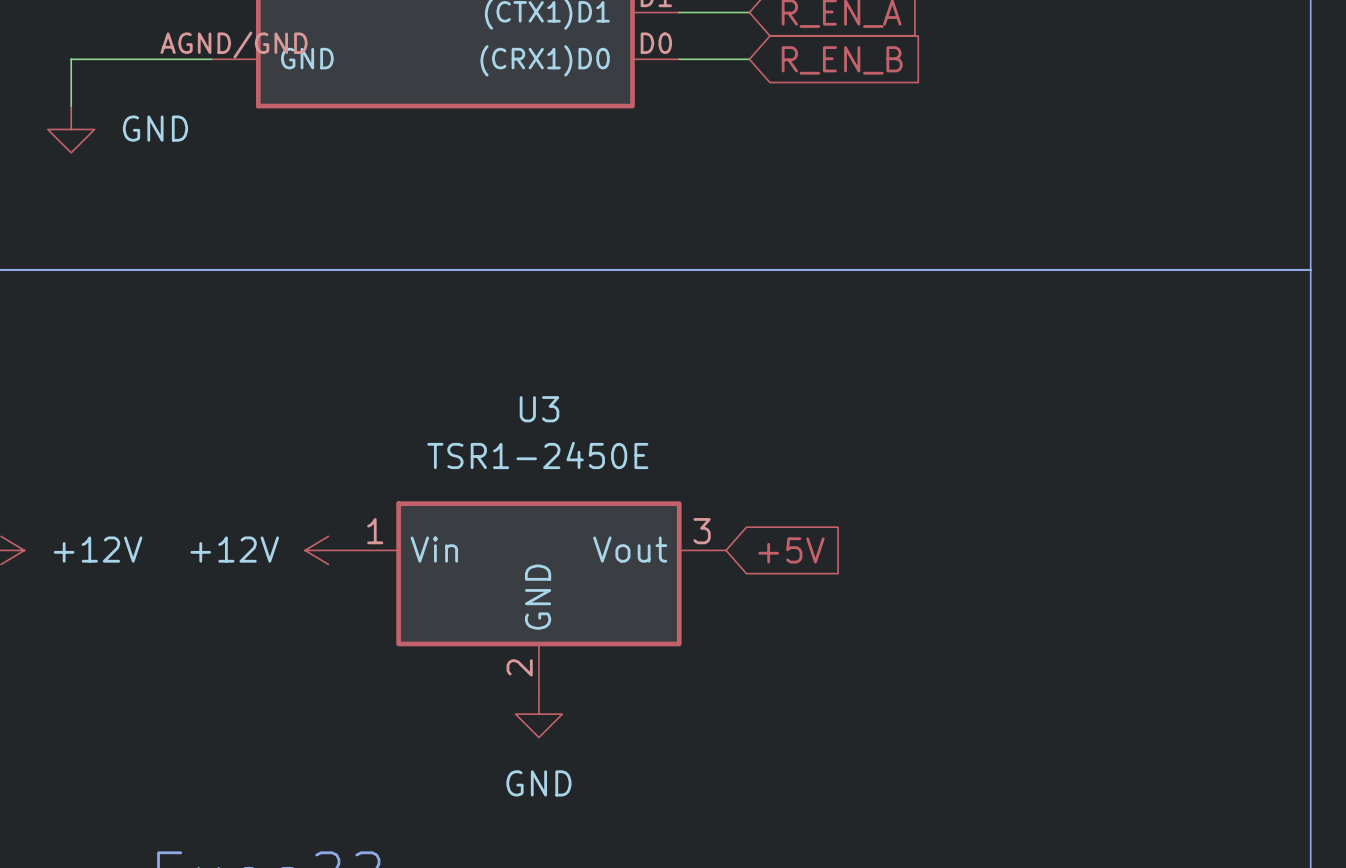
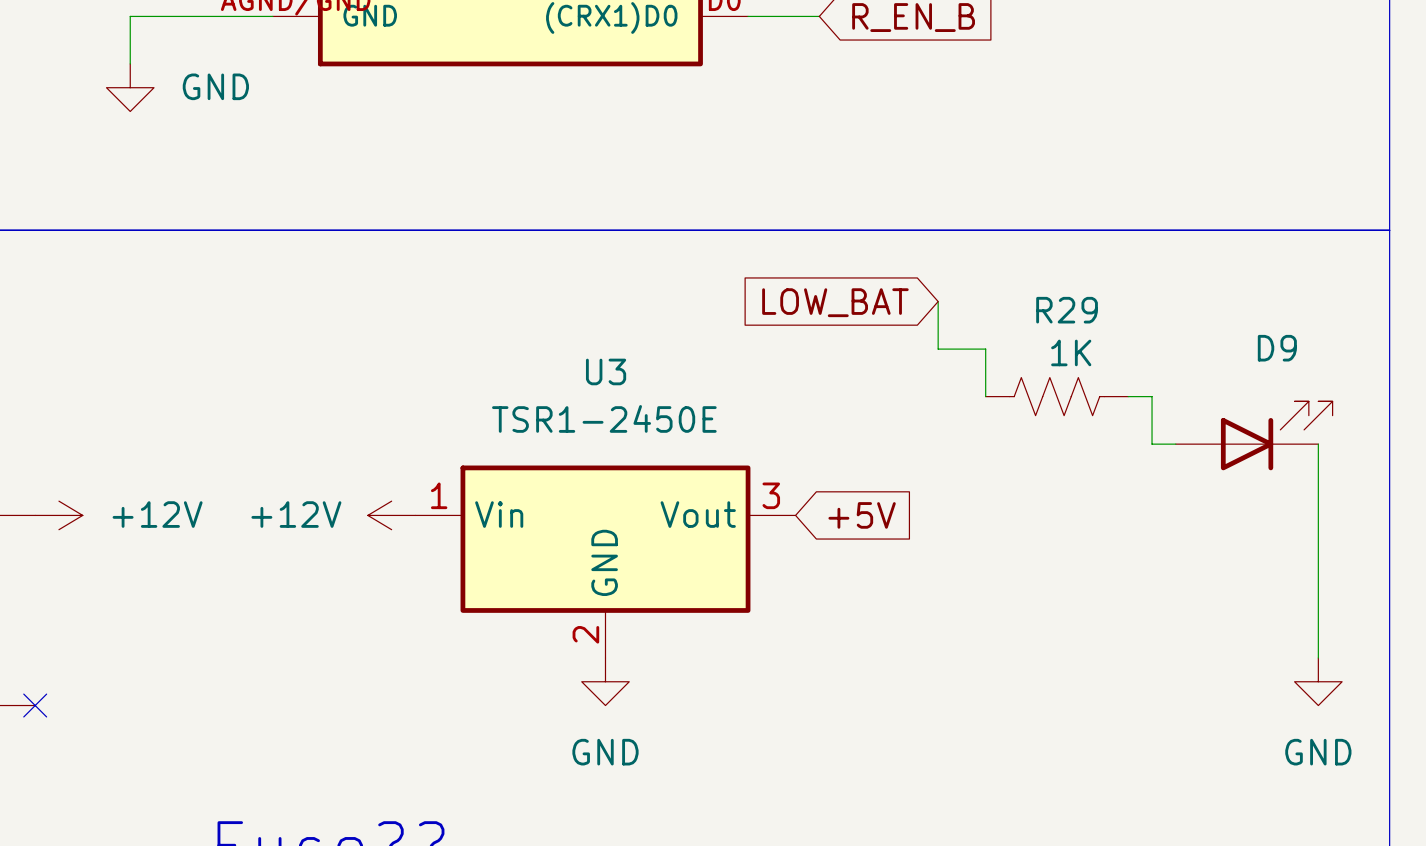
wire: none -> (938, 301) (938, 349) (985, 349) (985, 396)
global label: none -> LOW_BAT (835, 302)
R29: none -> 1K (1056, 396)
wire: none -> (1128, 396) (1152, 396) (1152, 444) (1175, 444)
D9: none -> (1254, 435)
wire: none -> (1318, 444) (1318, 658)
power symbol: none -> GND (1318, 681)

